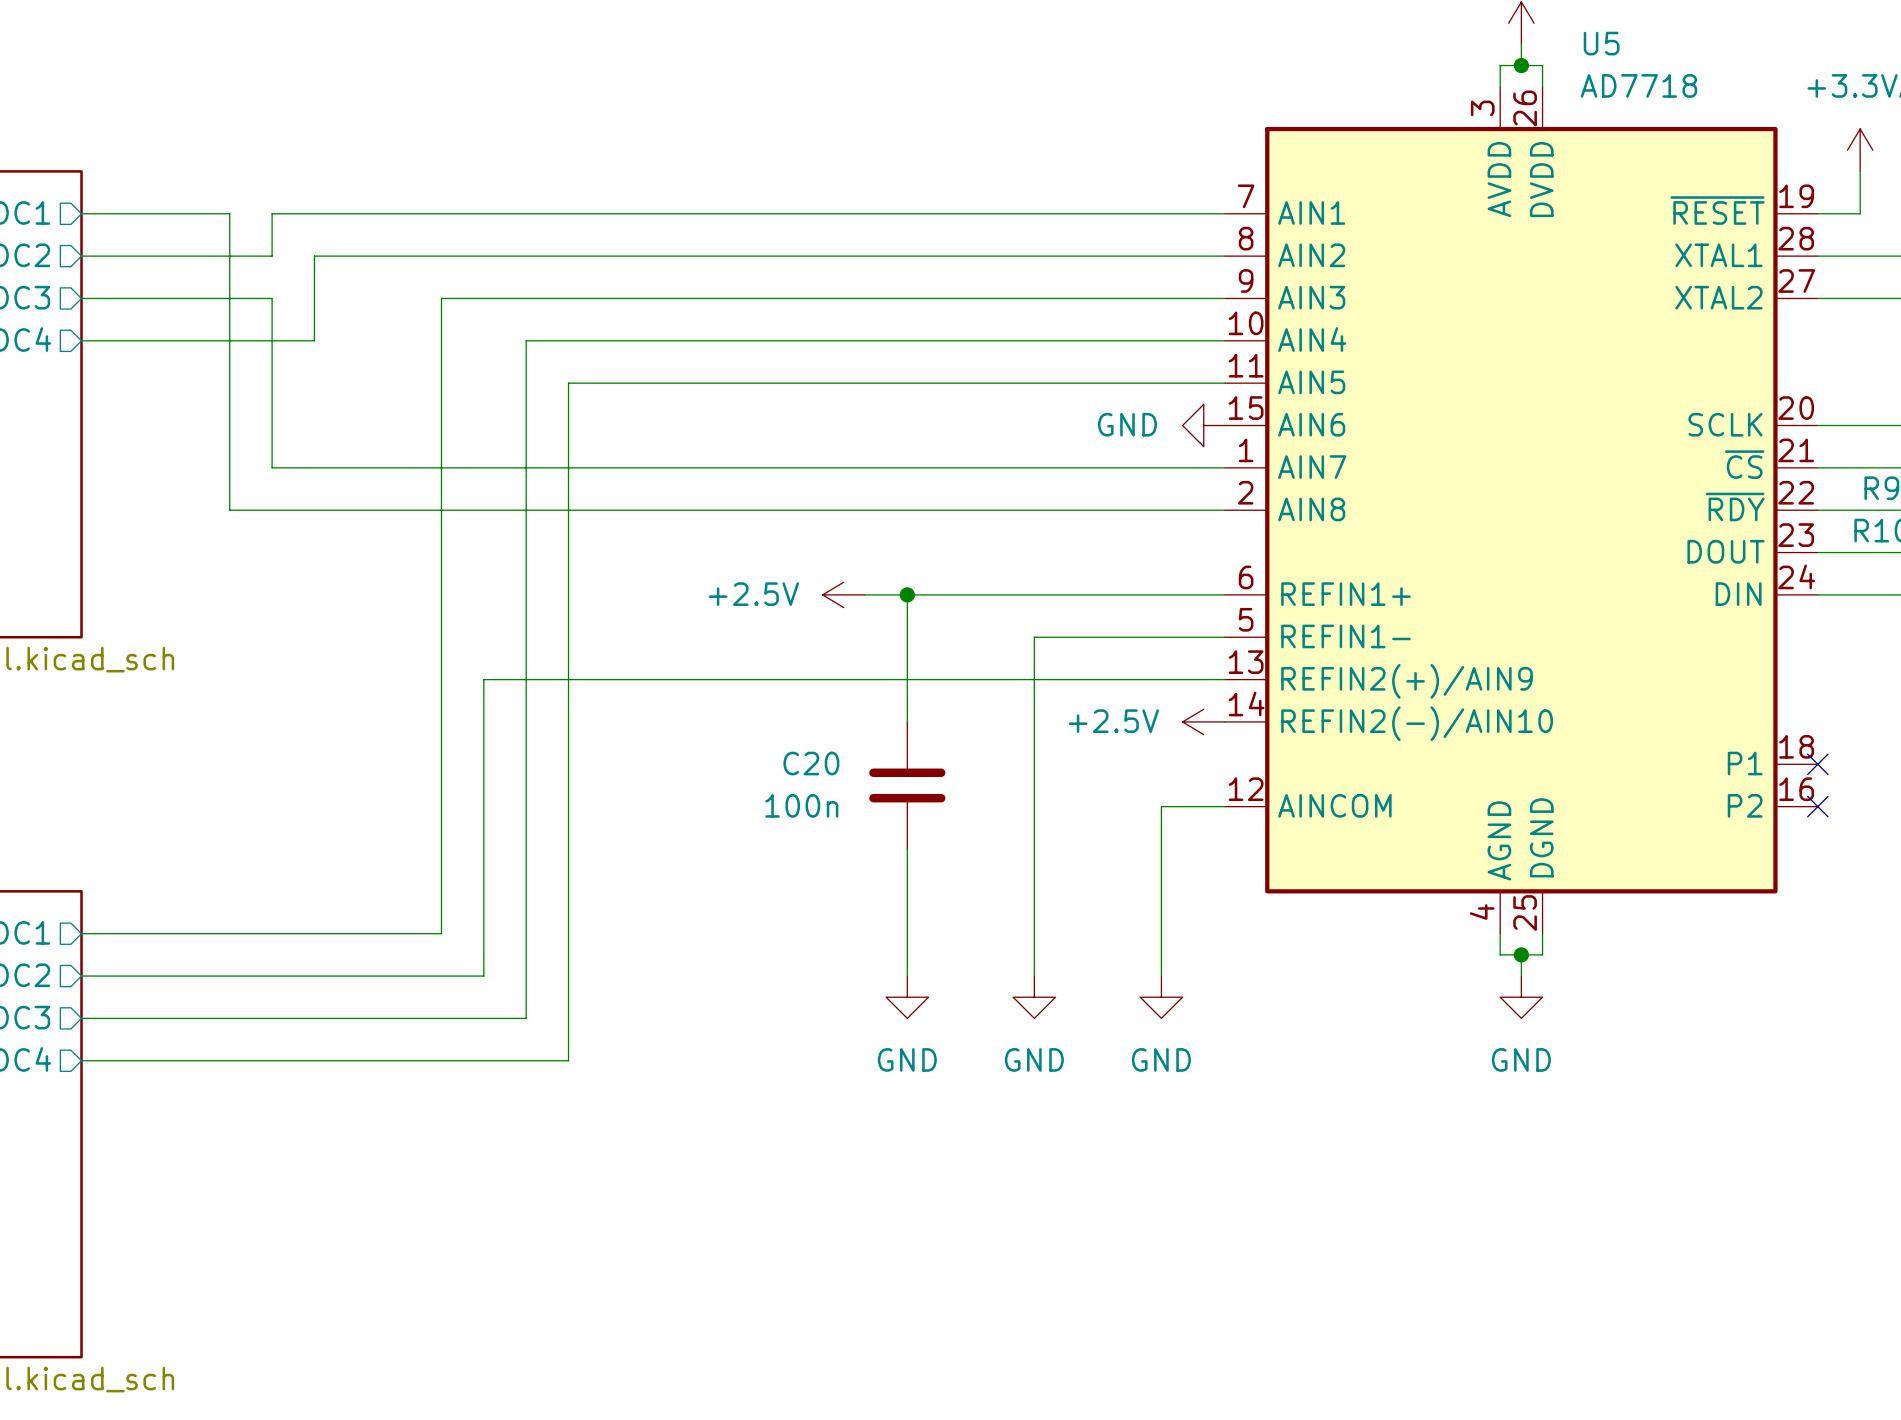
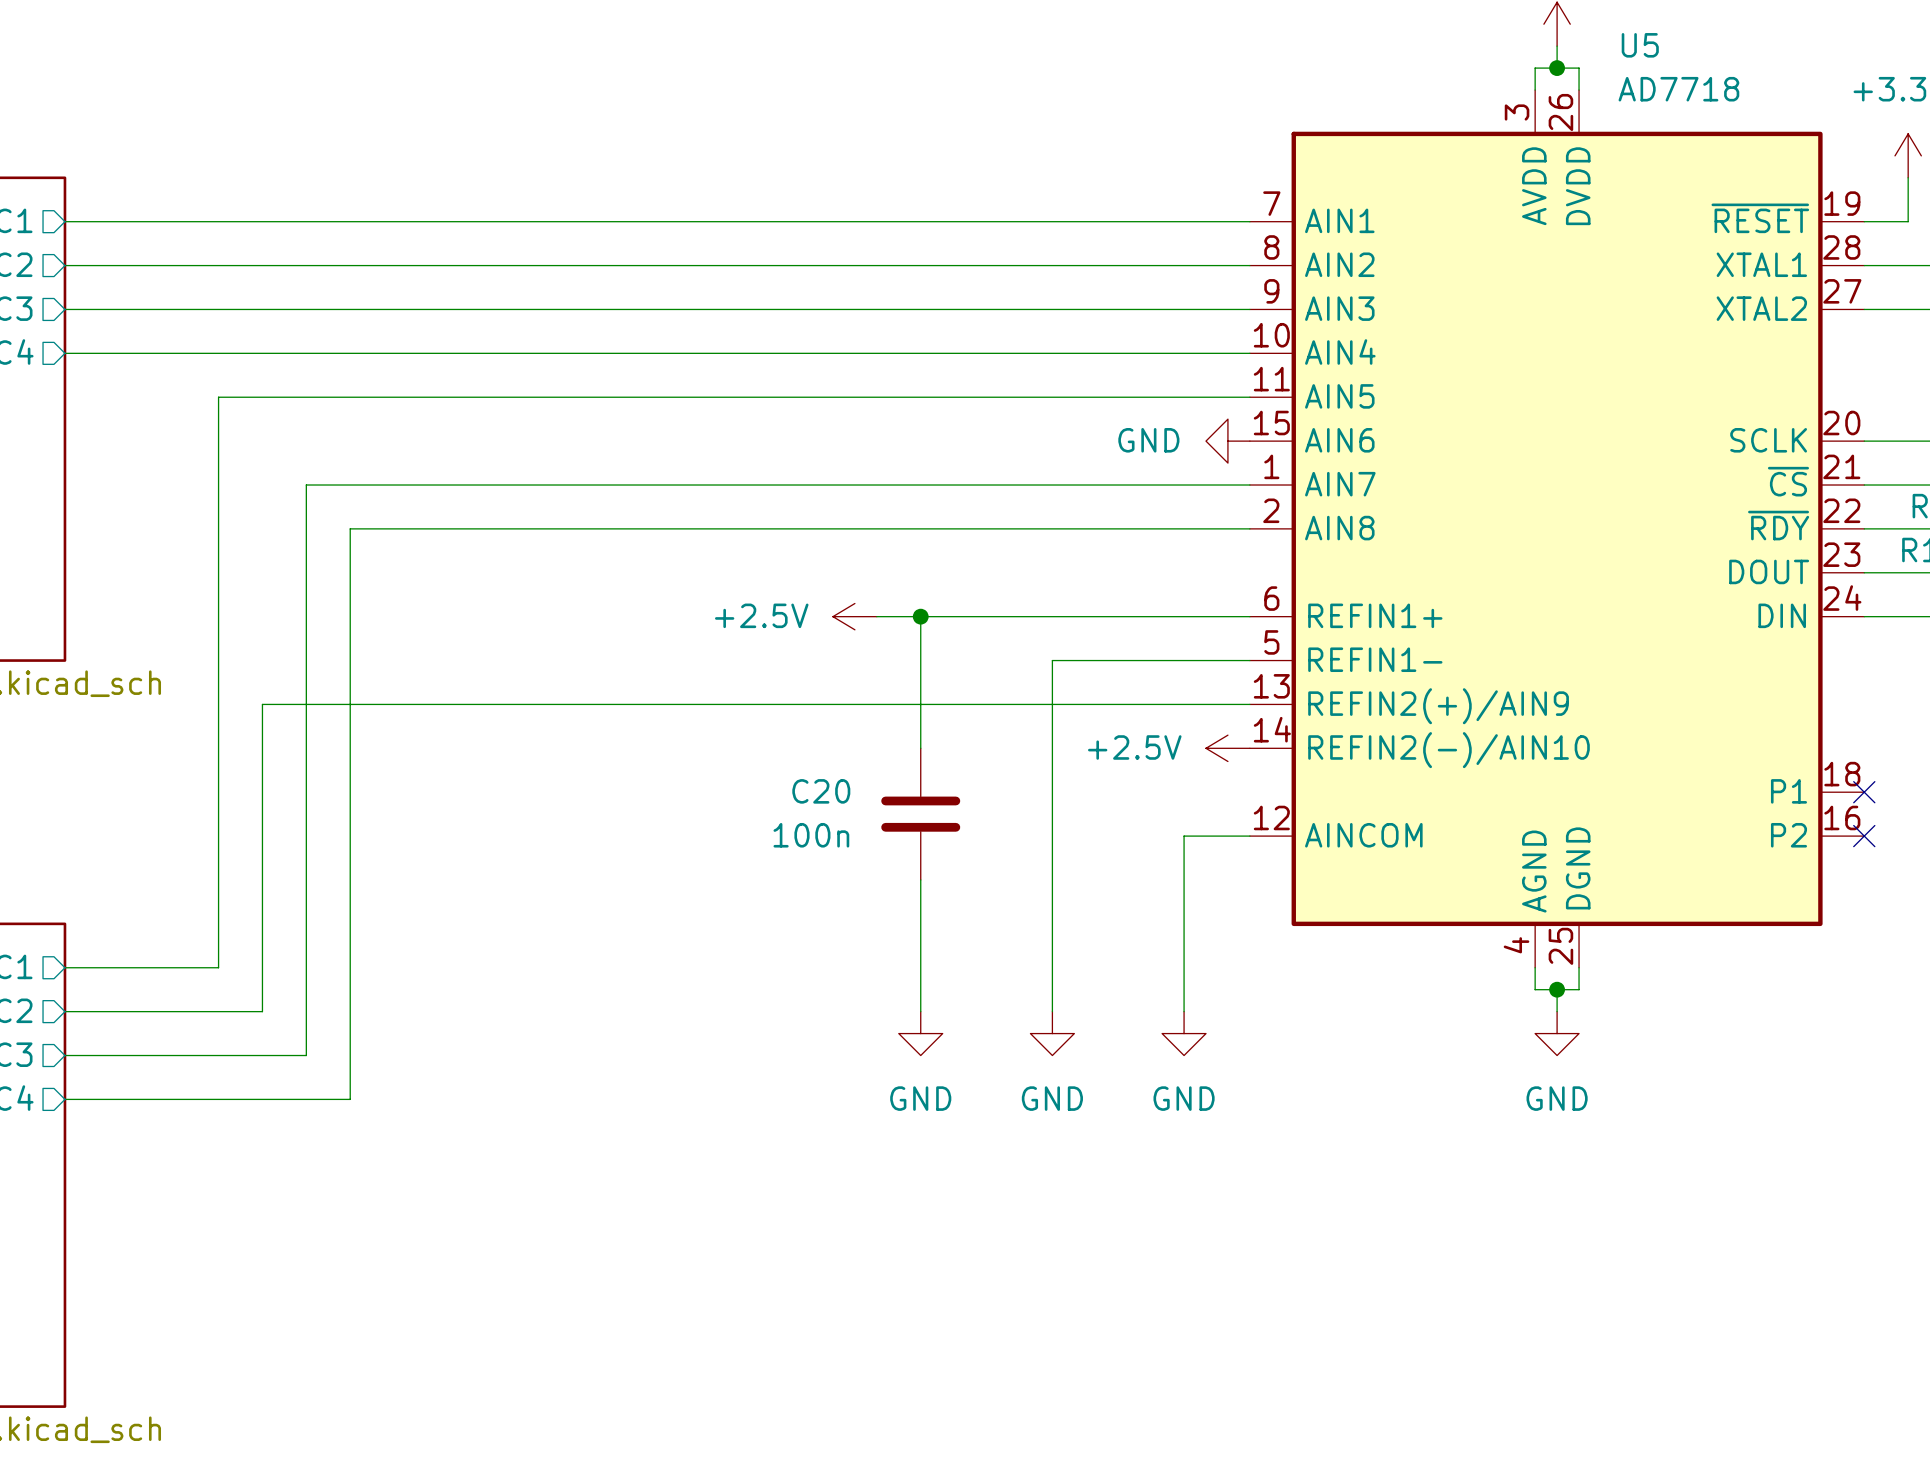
wire: (229, 213) (229, 383) -> (569, 397) (218, 397)
wire: (272, 213) (272, 256) -> (262, 221) (218, 221)
wire: (314, 256) (314, 340) -> (306, 265) (262, 265)
wire: (272, 298) (272, 467) (314, 467) -> (262, 309) (437, 309)
wire: (441, 298) (441, 933) (229, 933) -> (218, 528) (218, 967)
wire: none -> (306, 353) (525, 353)
wire: (526, 340) (526, 1018) (314, 1018) -> (306, 485) (306, 1055)
wire: (568, 383) (568, 1060) (356, 1060) -> (350, 528) (350, 1099)
wire: (229, 510) (356, 510) -> none
wire: (483, 679) (483, 976) (272, 976) -> (481, 704) (262, 704) (262, 1011)

